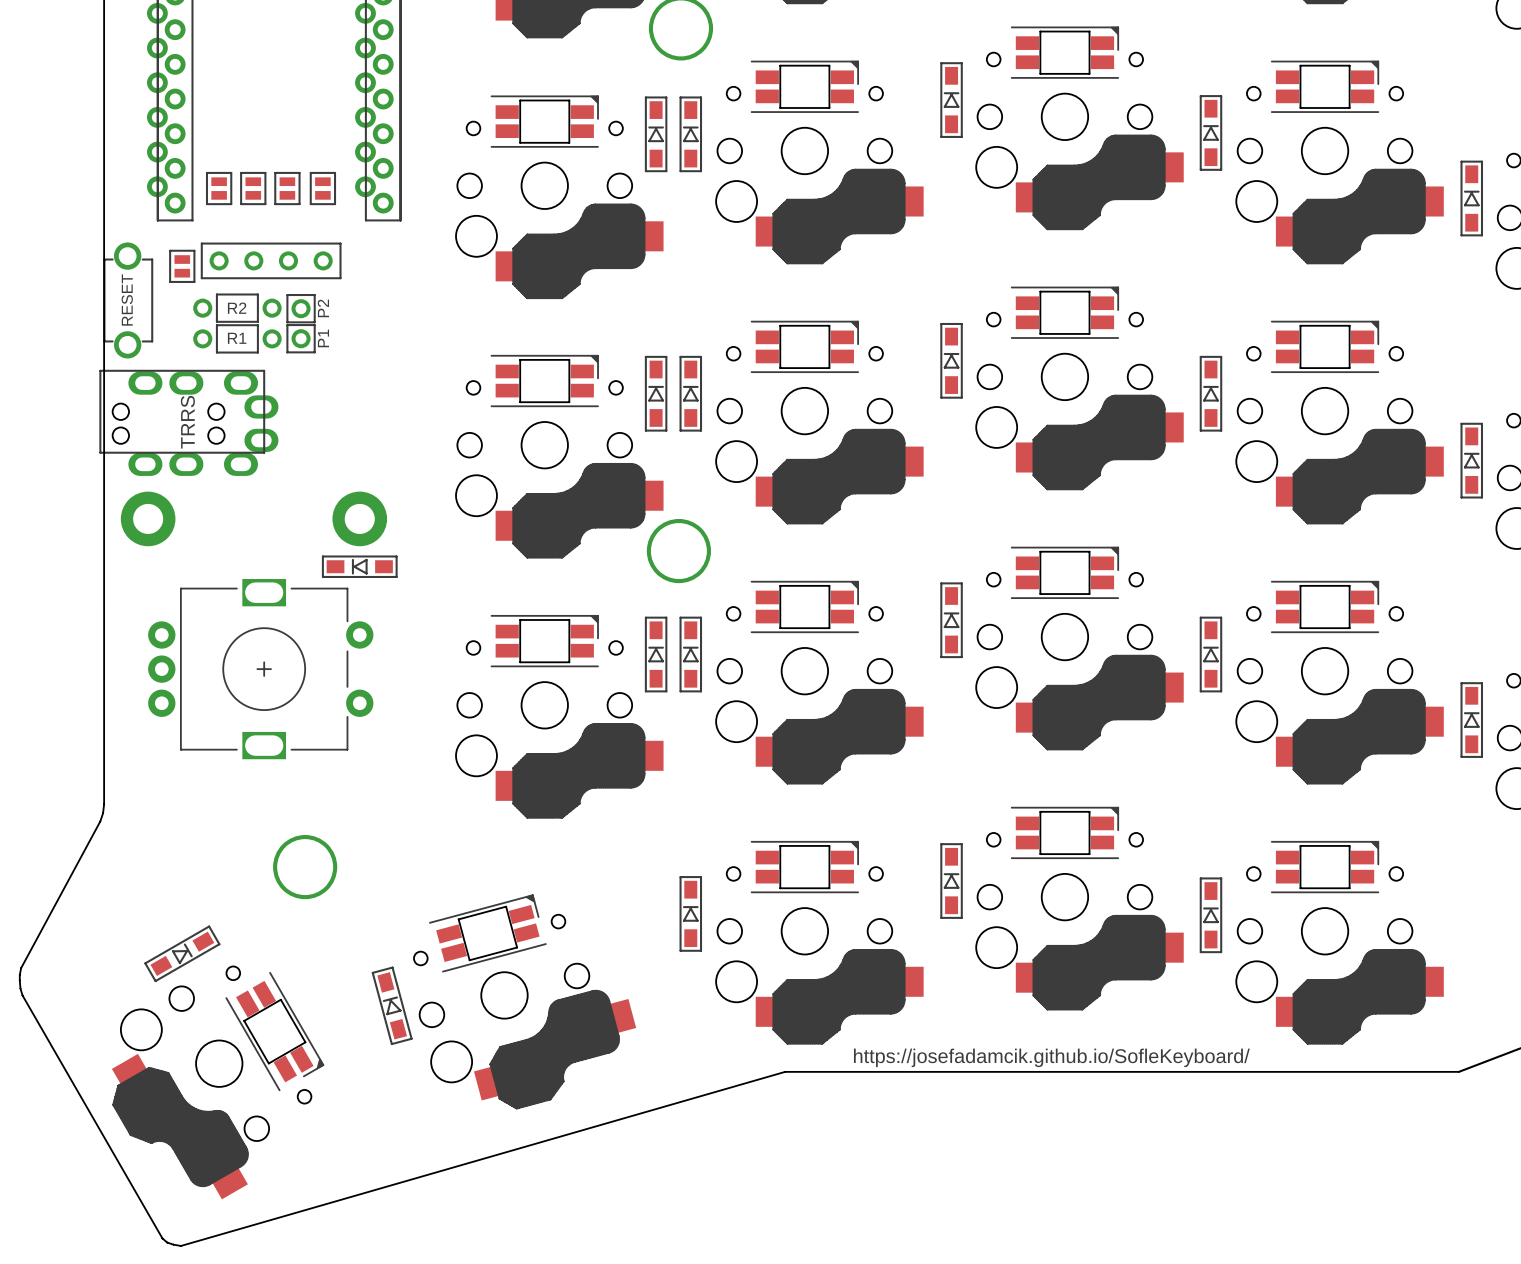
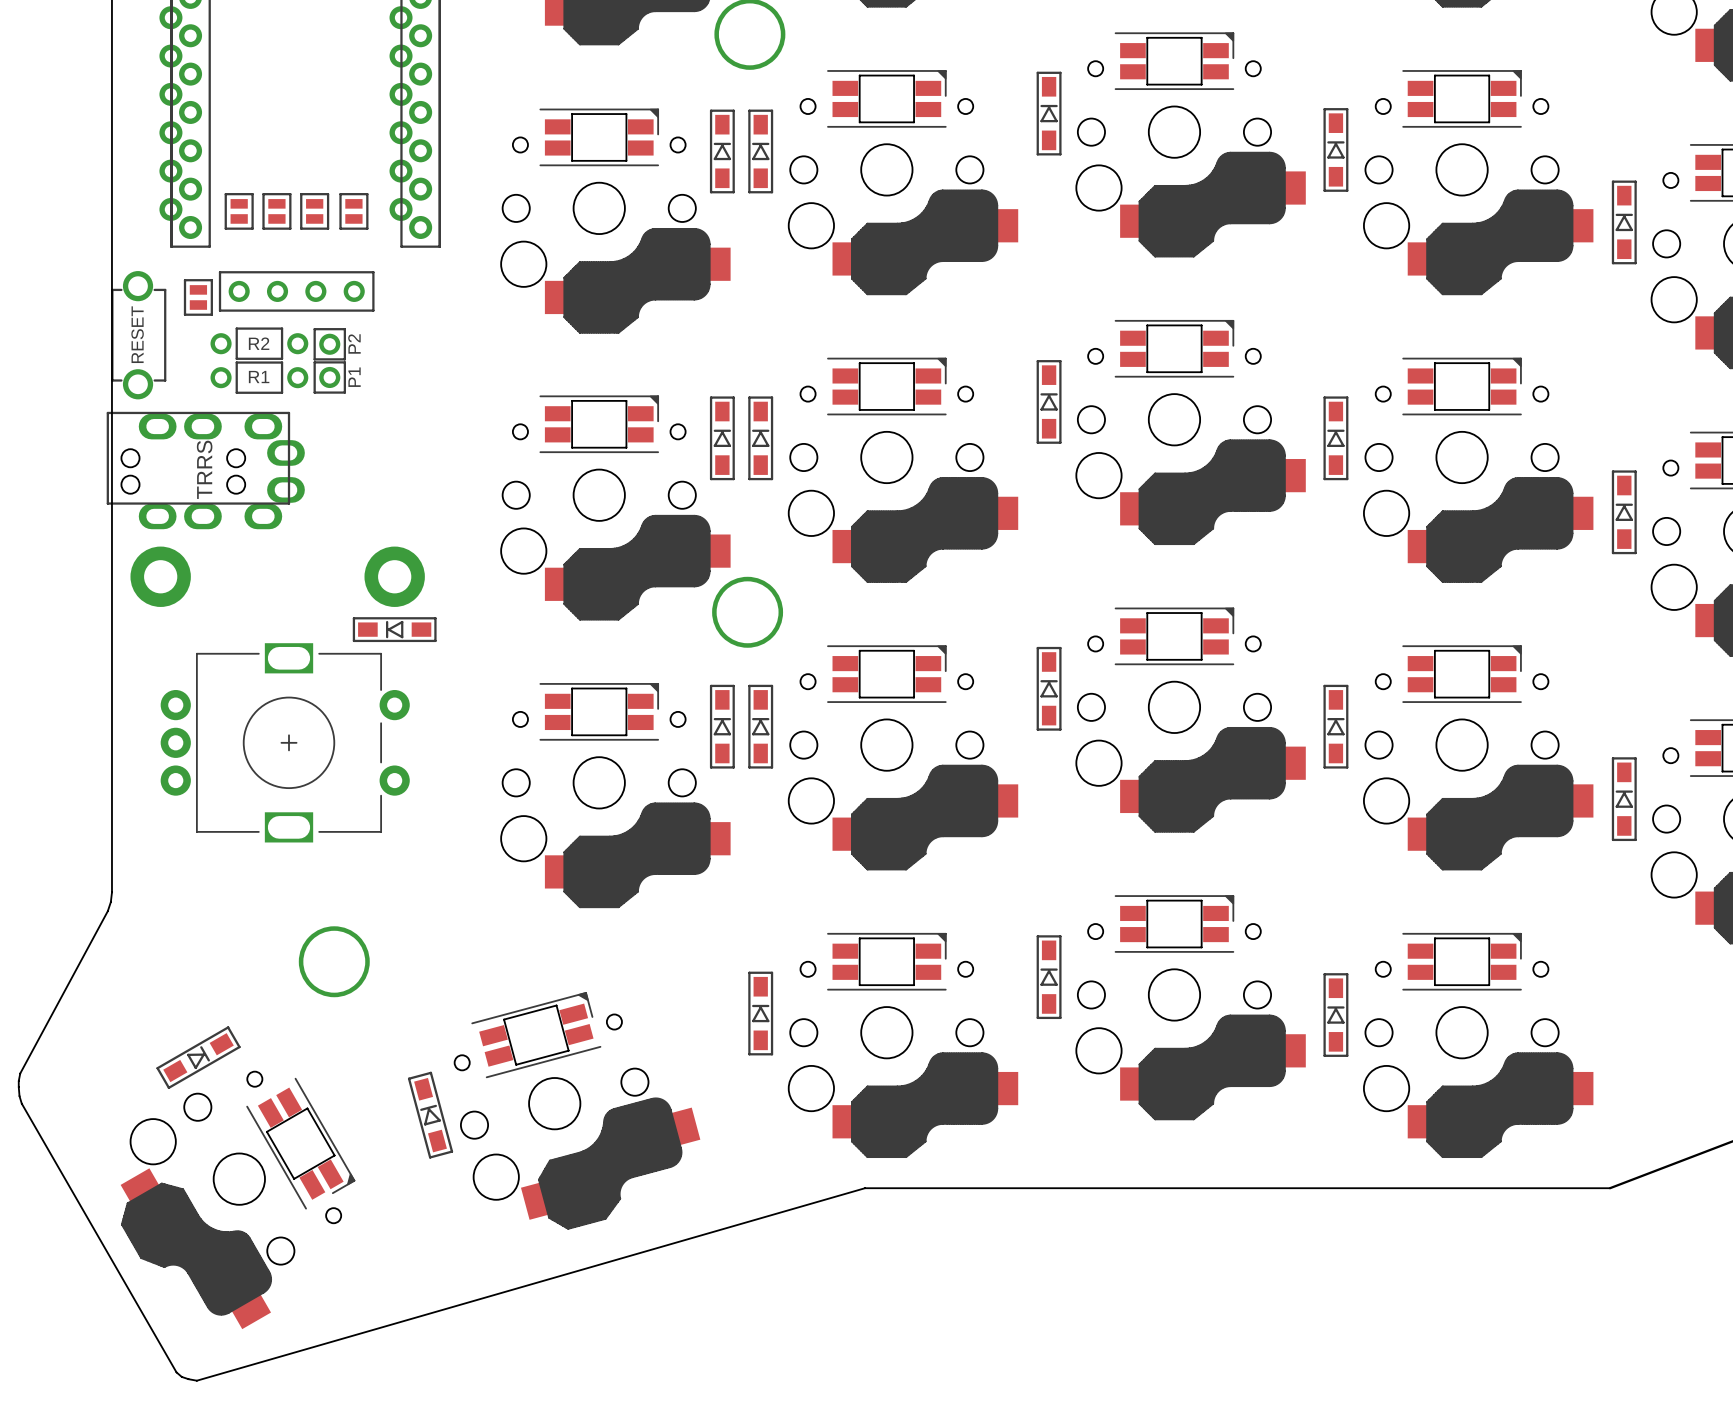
text: https://josefadamcik.github.io/SofleKeyboard/ (1051, 1057) -> none

